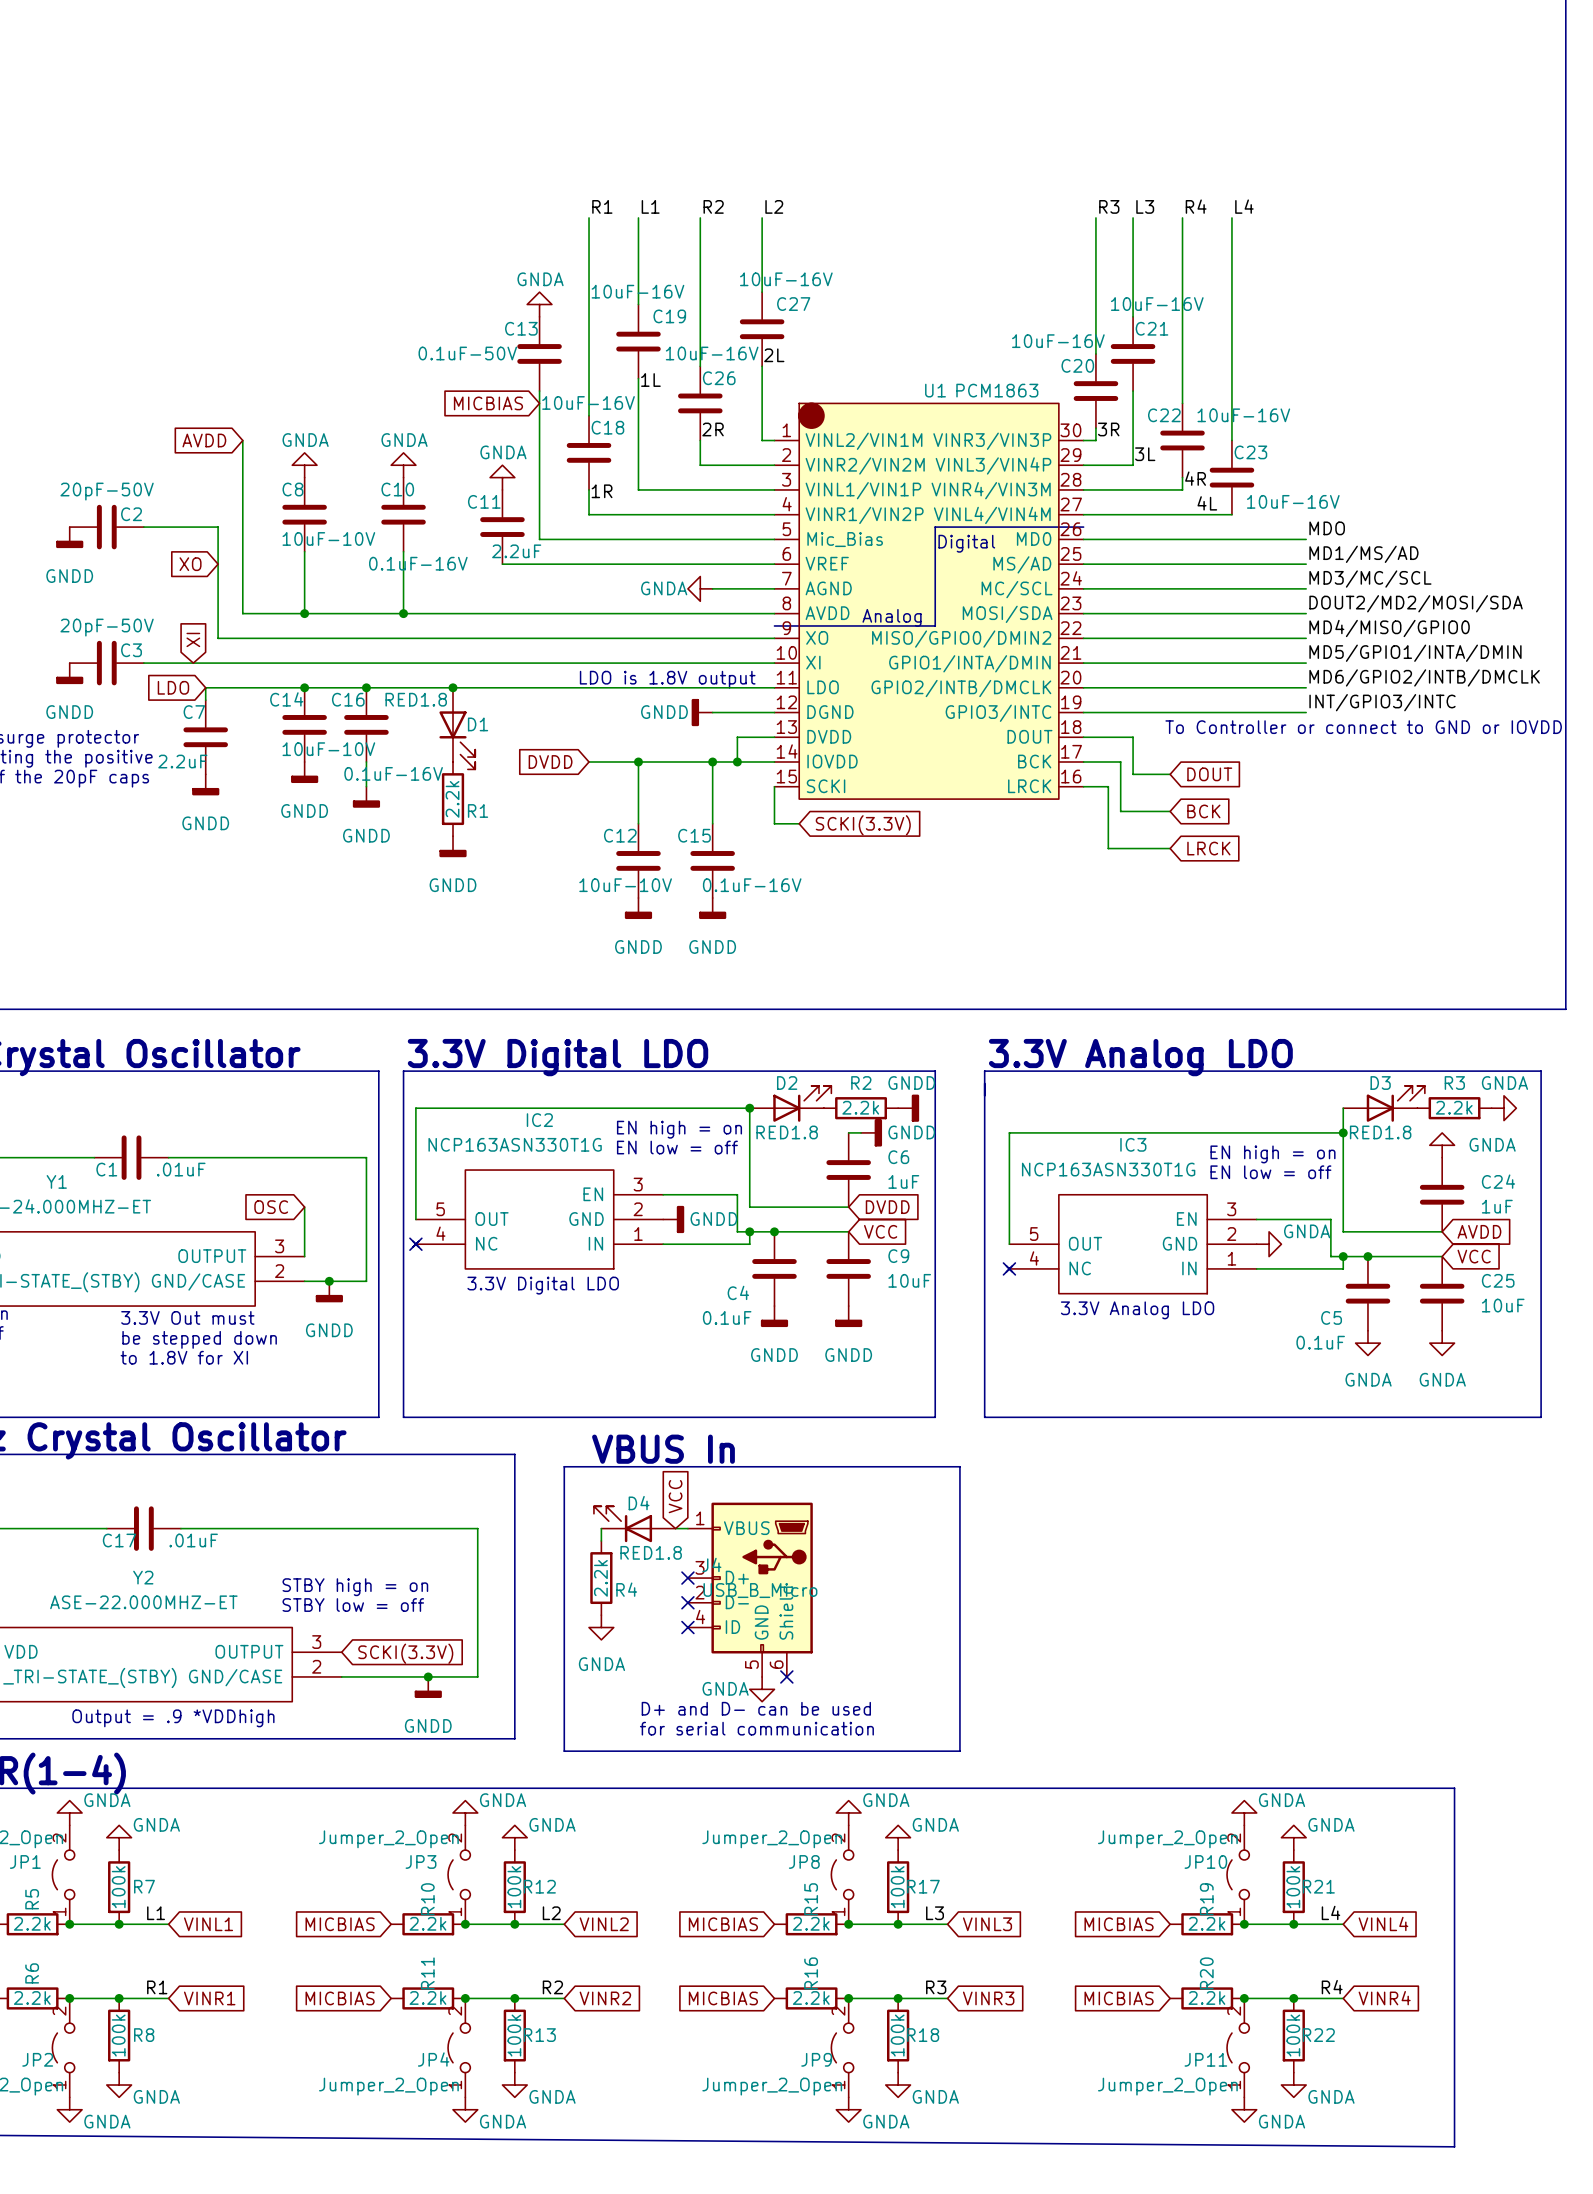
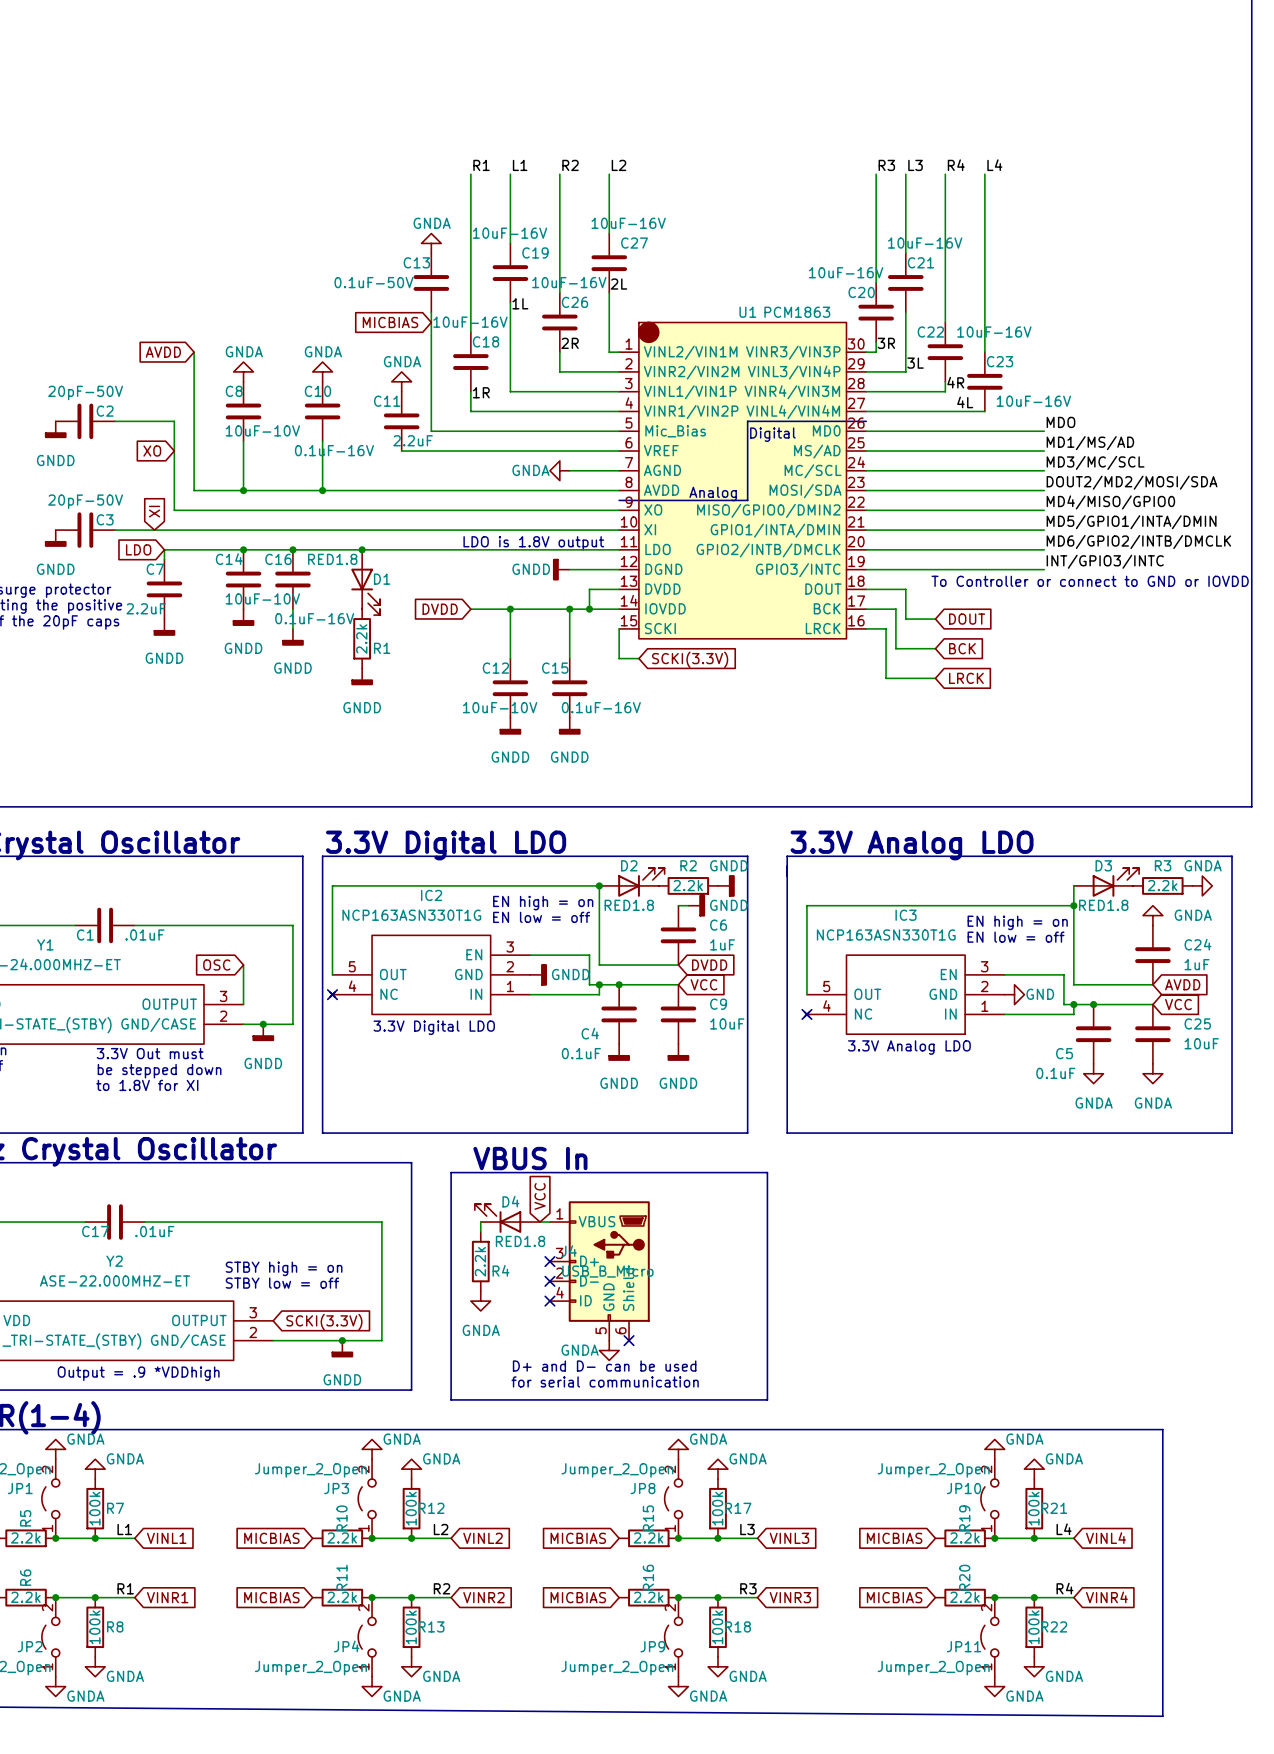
power symbol: GNDA (1269, 1244) -> GND (1014, 994)

